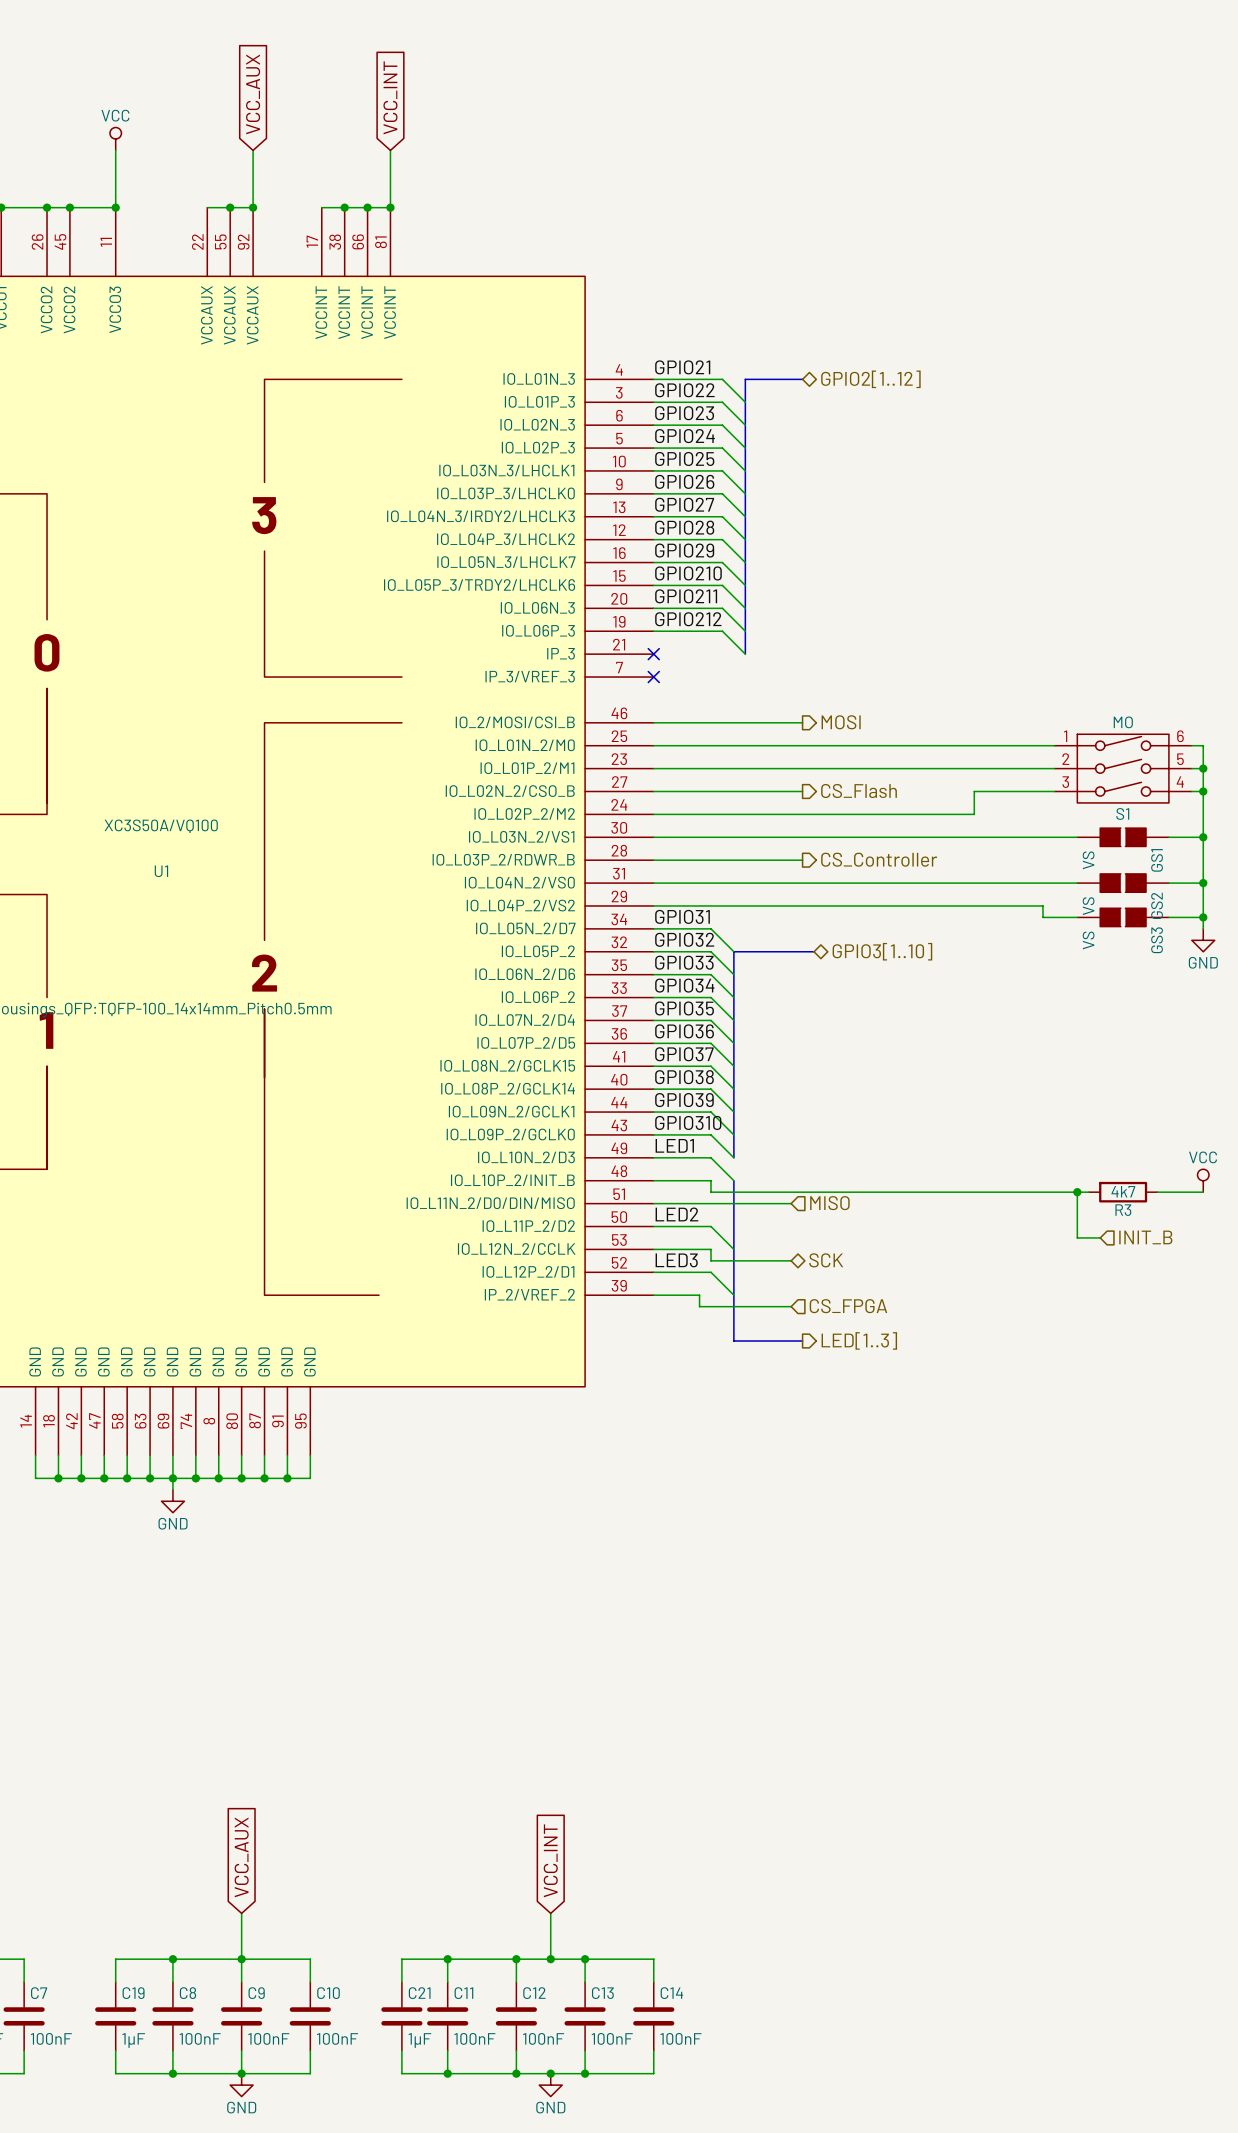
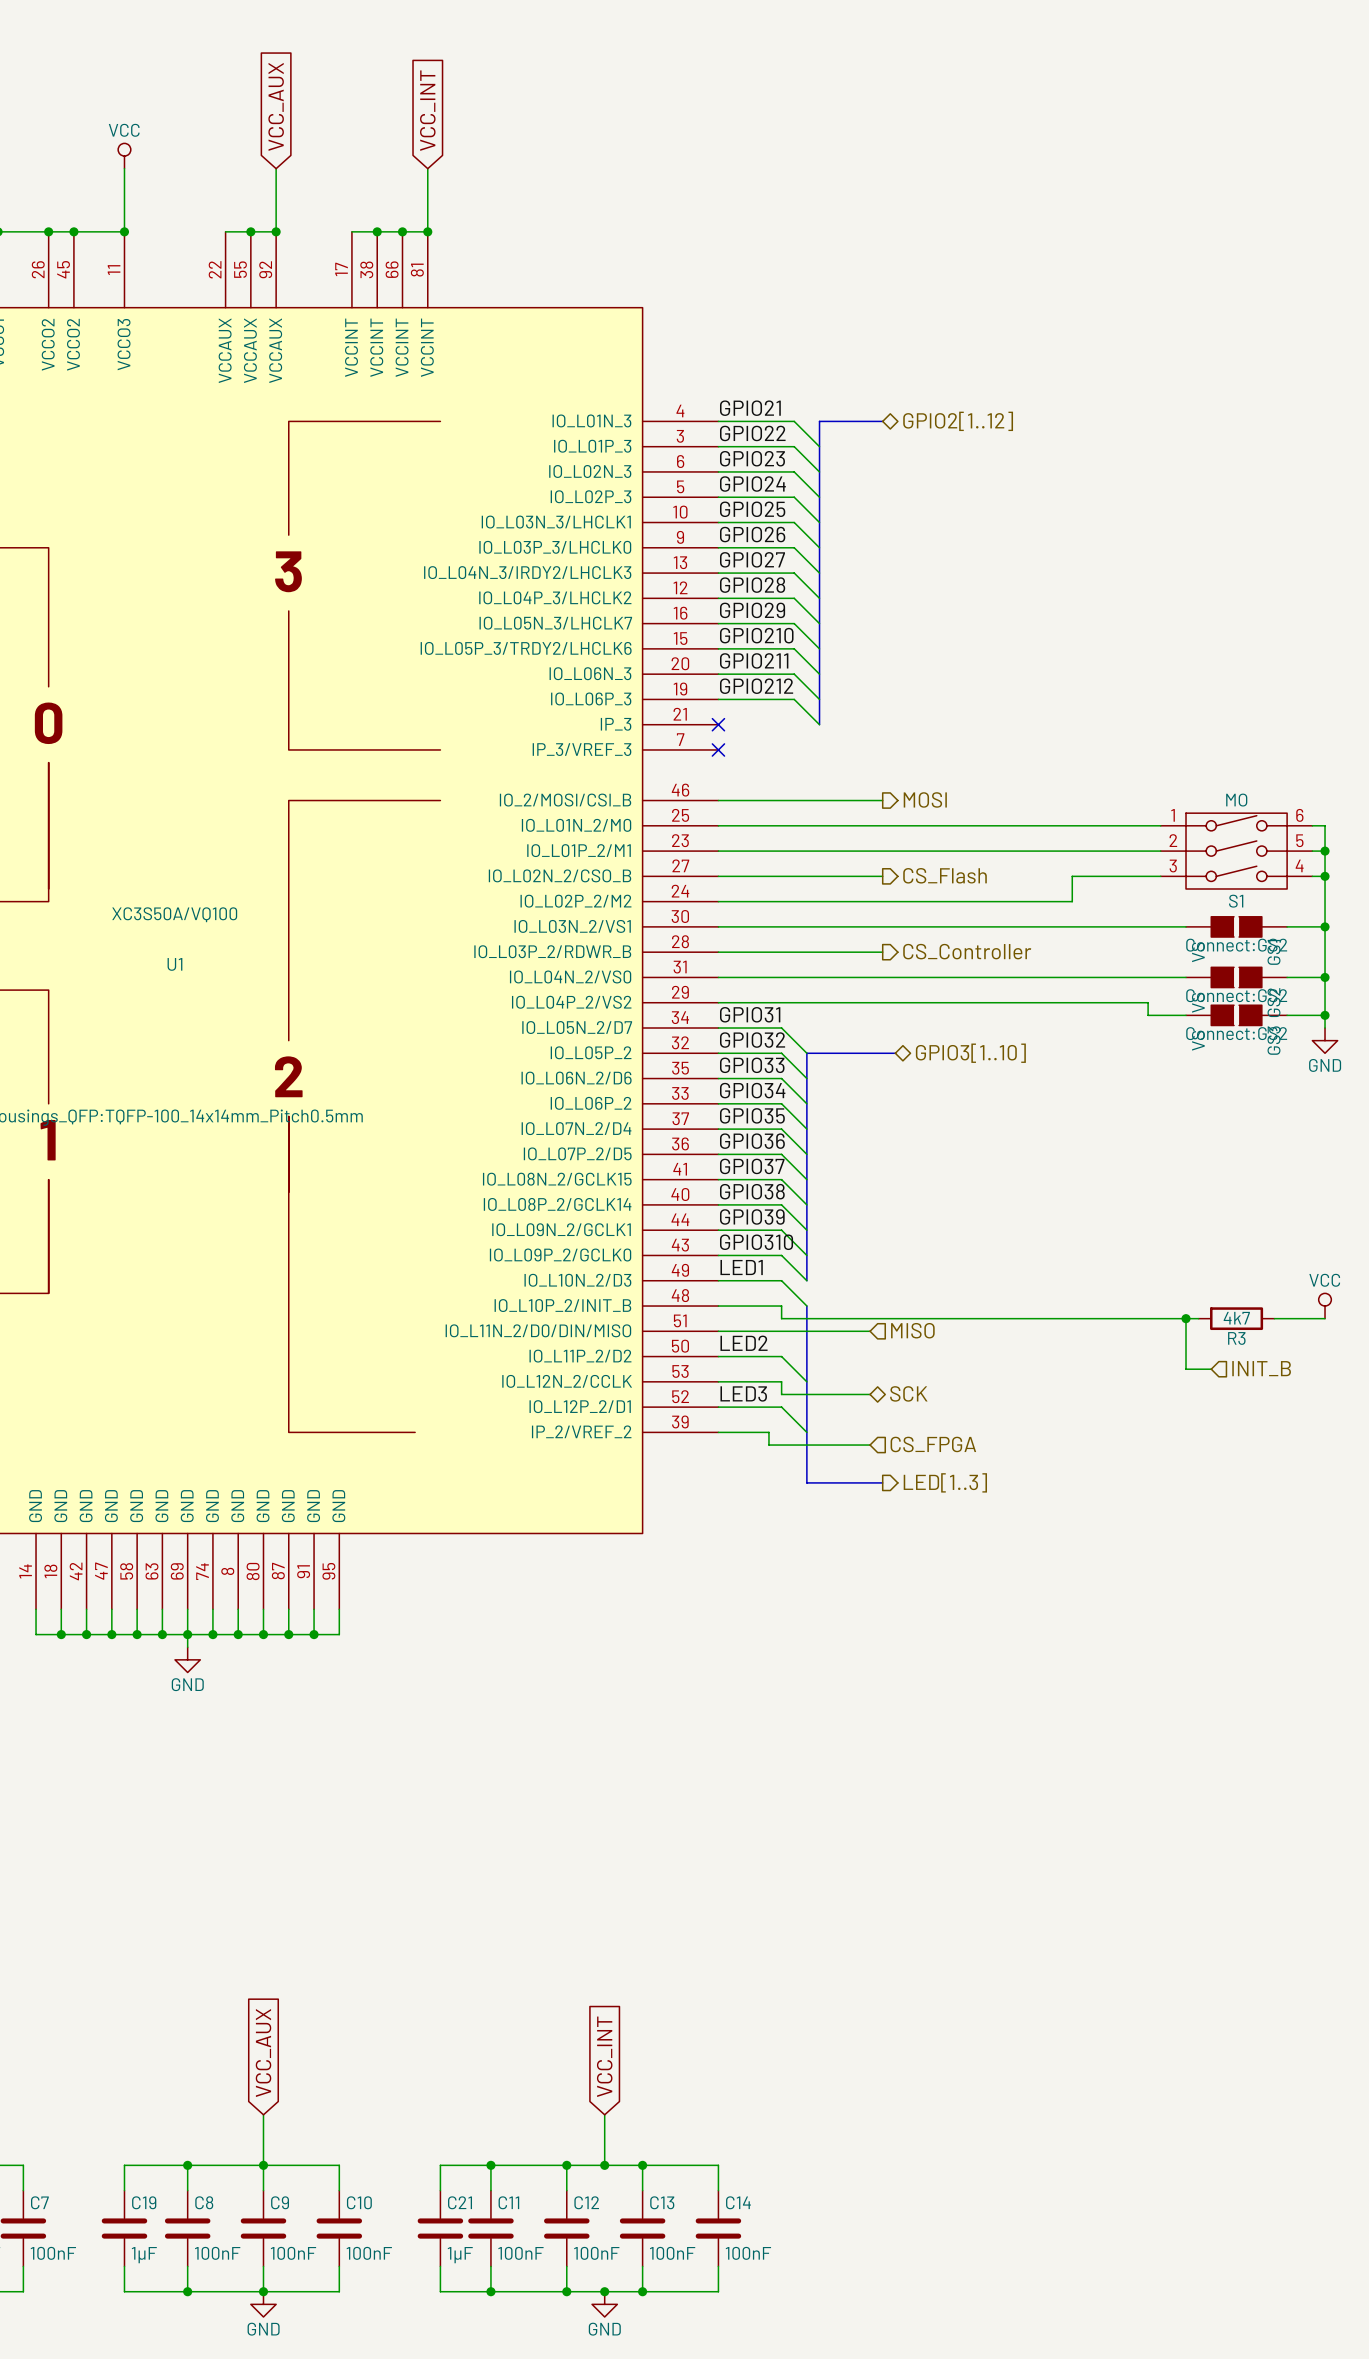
GS1 text: none -> Connect:GS2 (1236, 945)
GS2 text: none -> Connect:GS2 (1236, 995)
GS3 text: none -> Connect:GS2 (1236, 1033)

